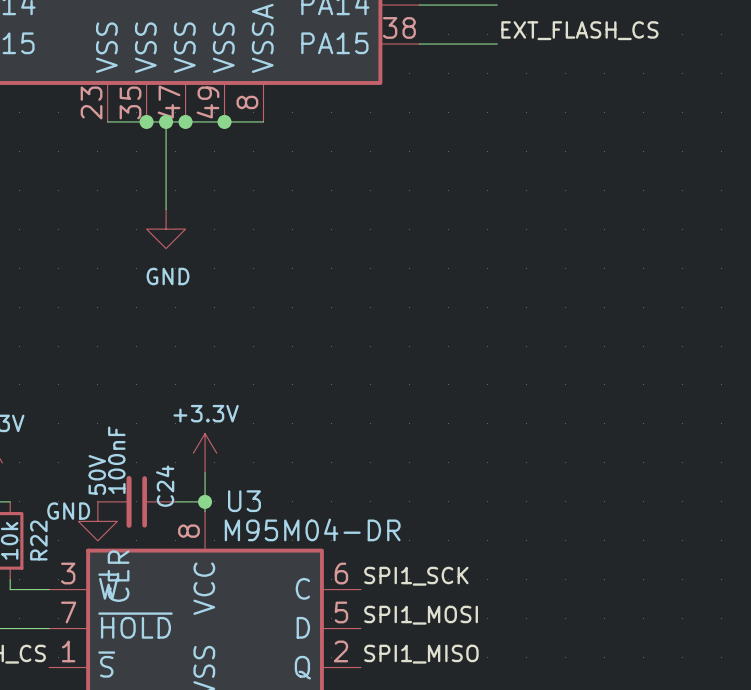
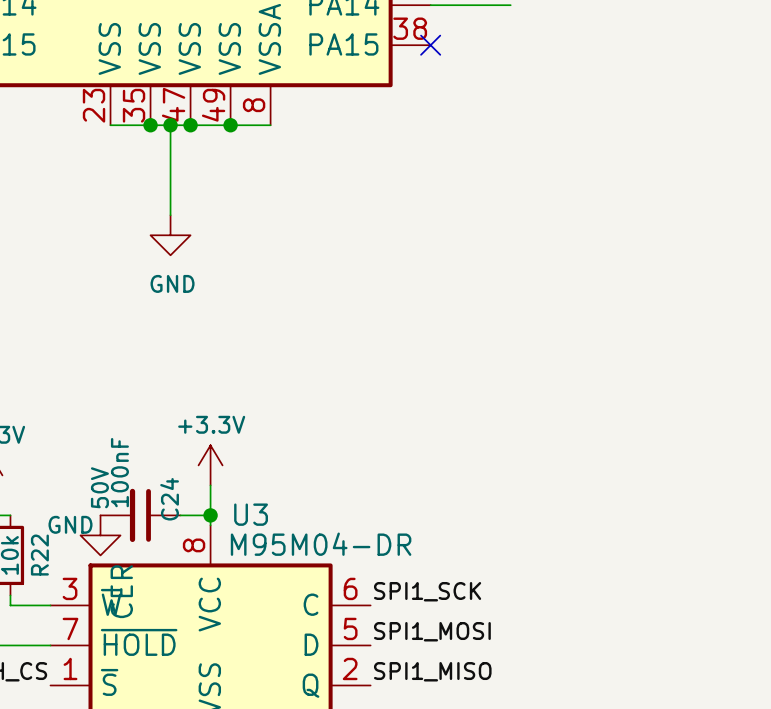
label: EXT_FLASH_CS (579, 30) -> none
wire: (419, 44) (497, 44) -> none
no-connect mark: none -> (430, 45)

